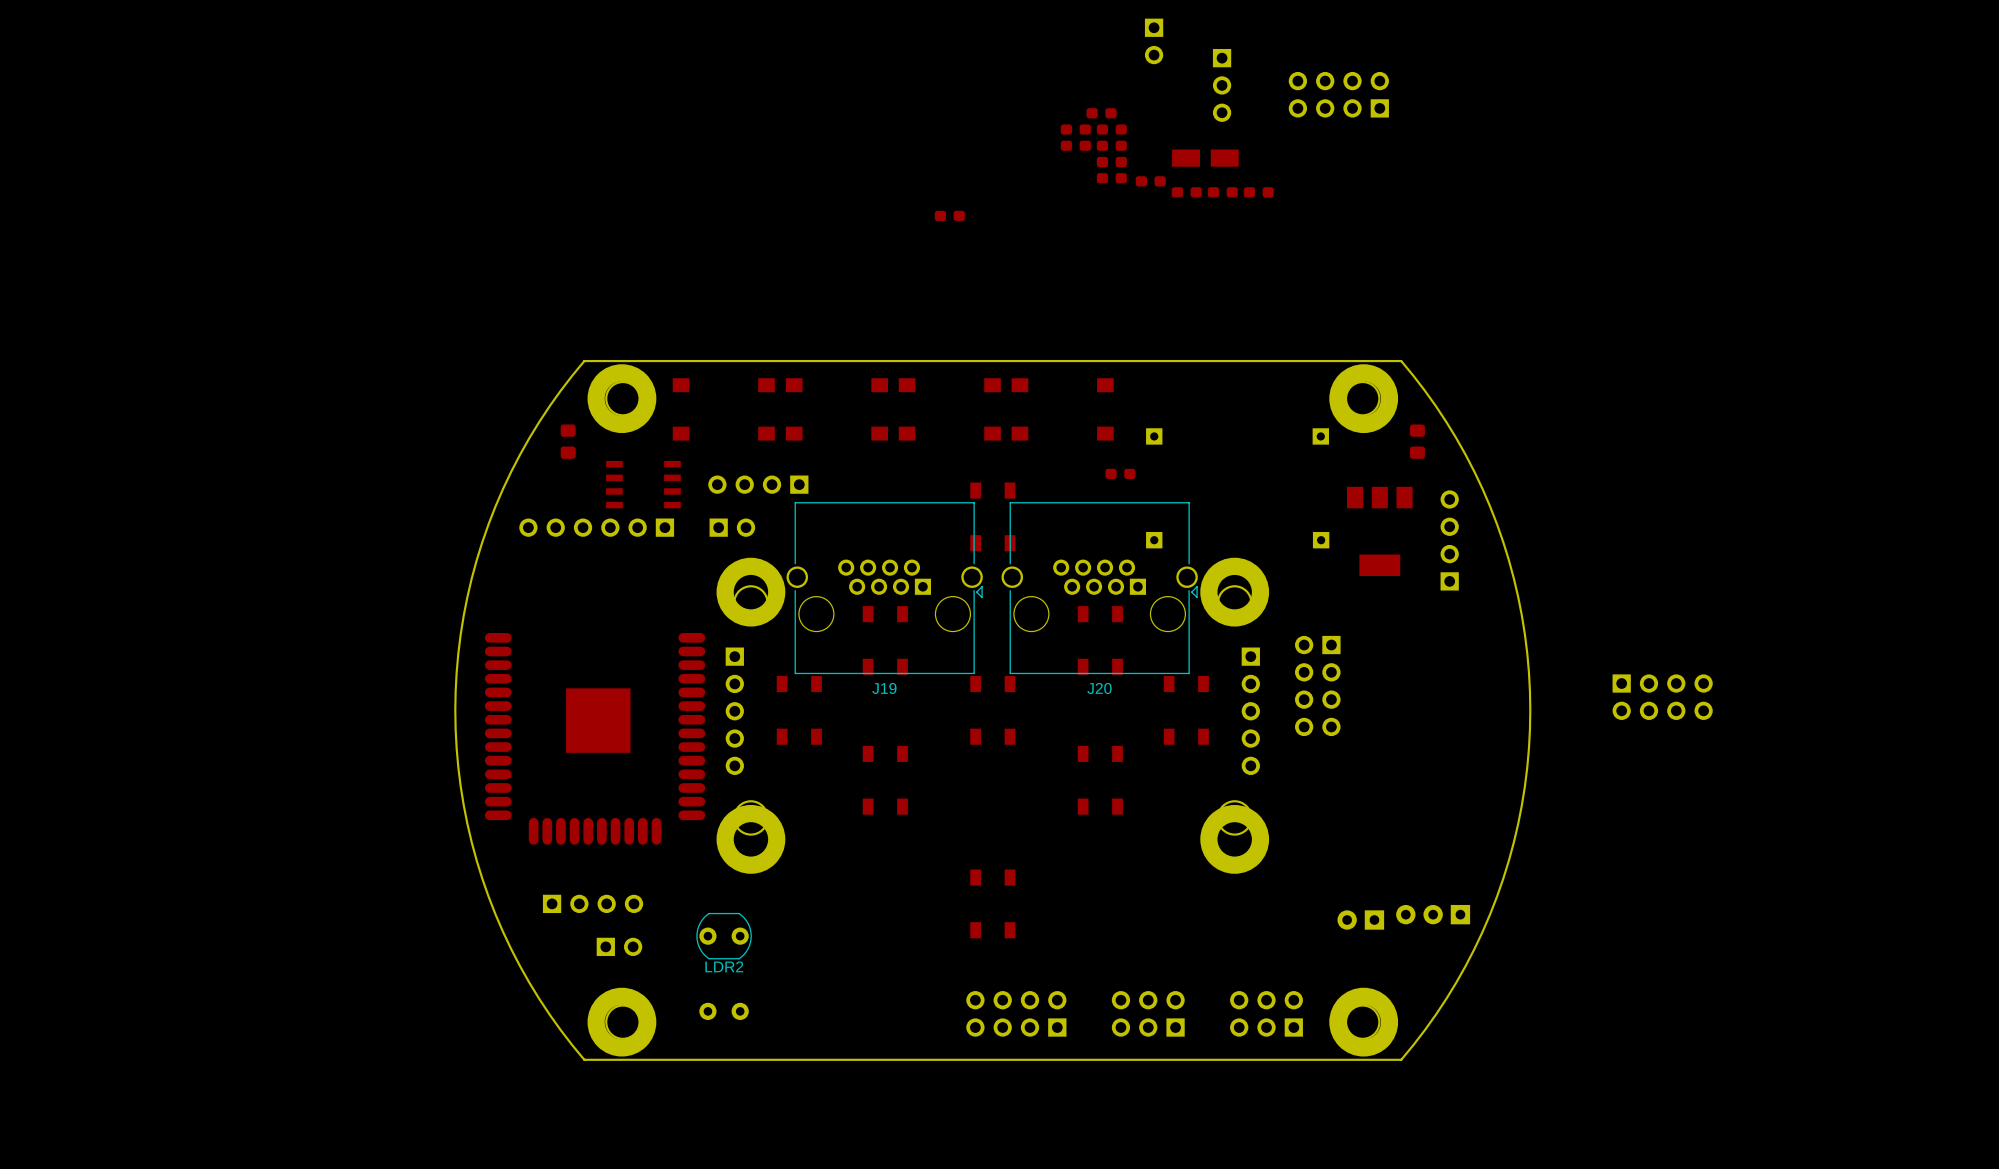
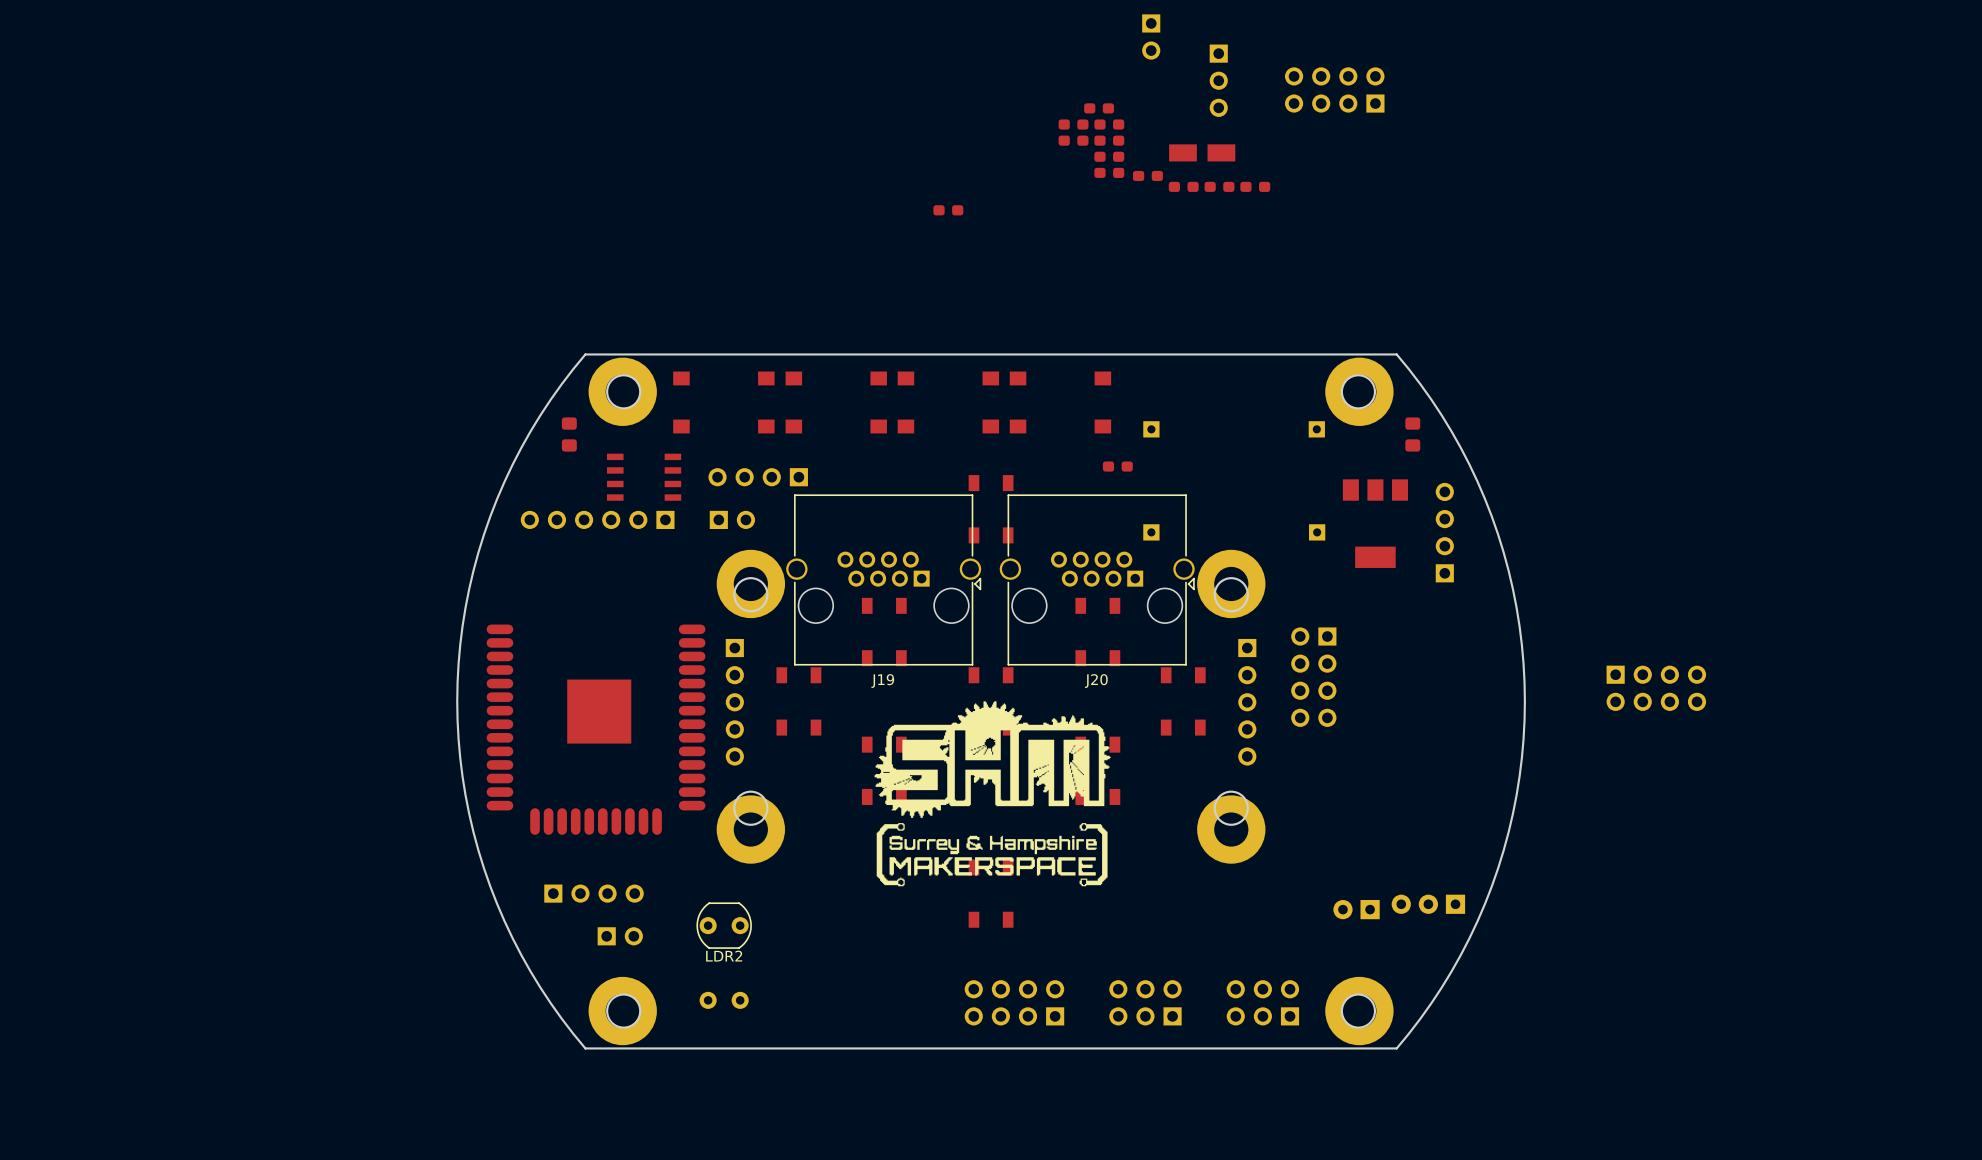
drawing: none -> [874, 701, 1111, 887]

